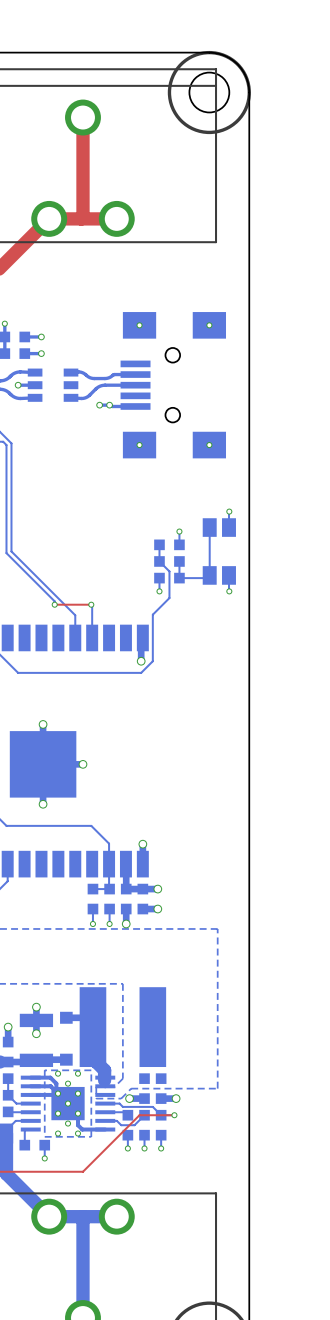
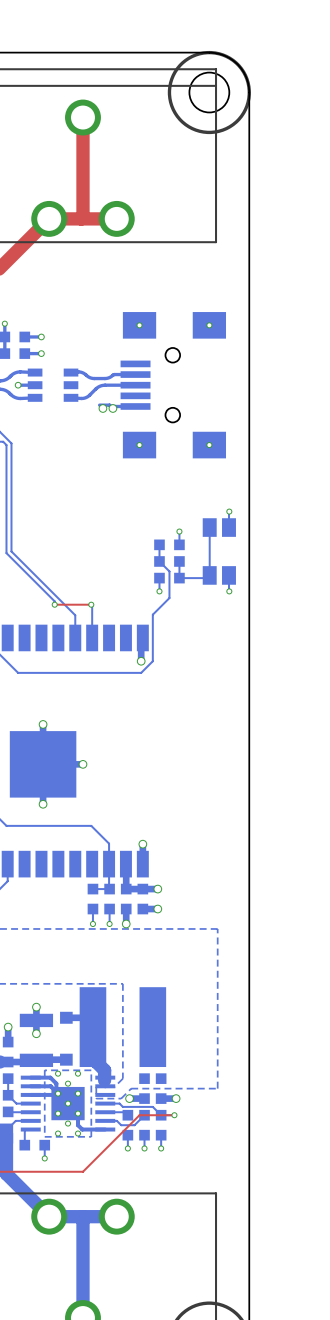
via: (99, 405) -> none
via: (109, 405) -> none
via: none -> (102, 408)
via: none -> (112, 408)

